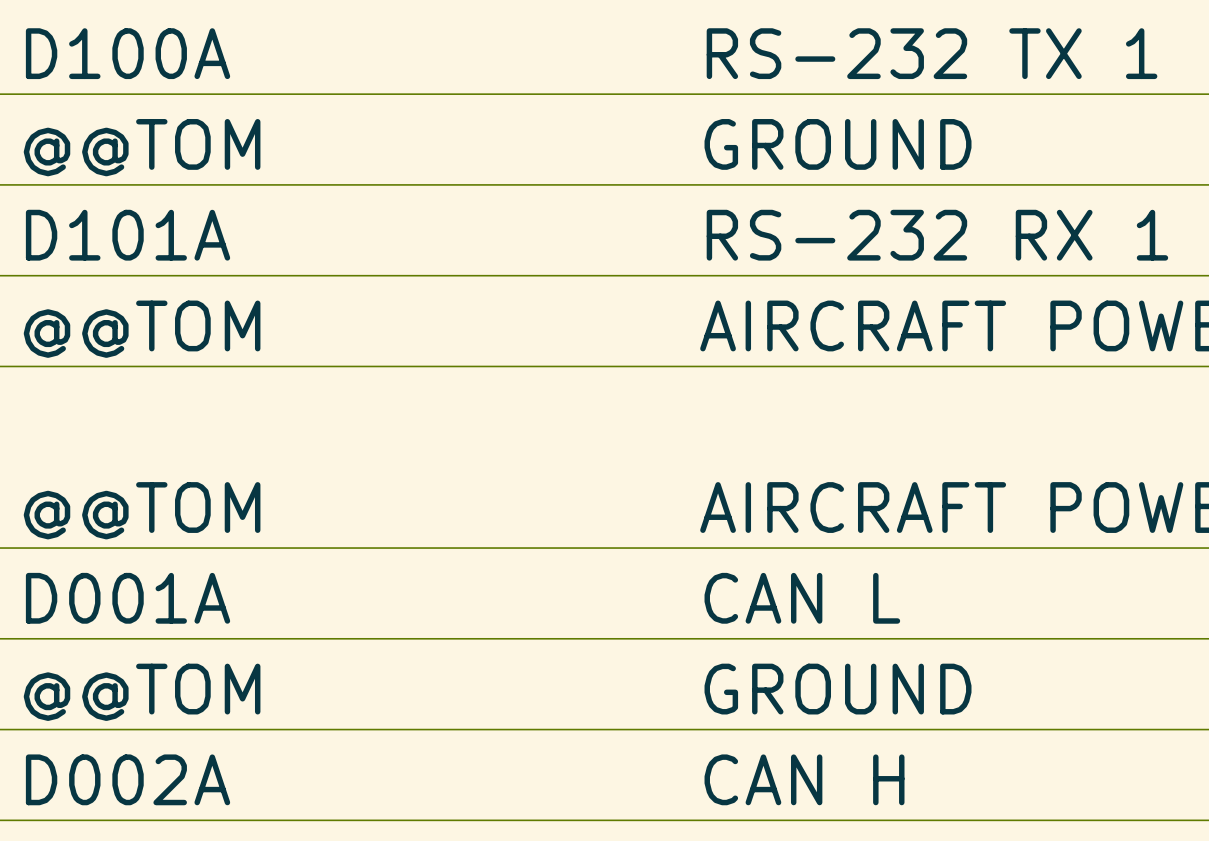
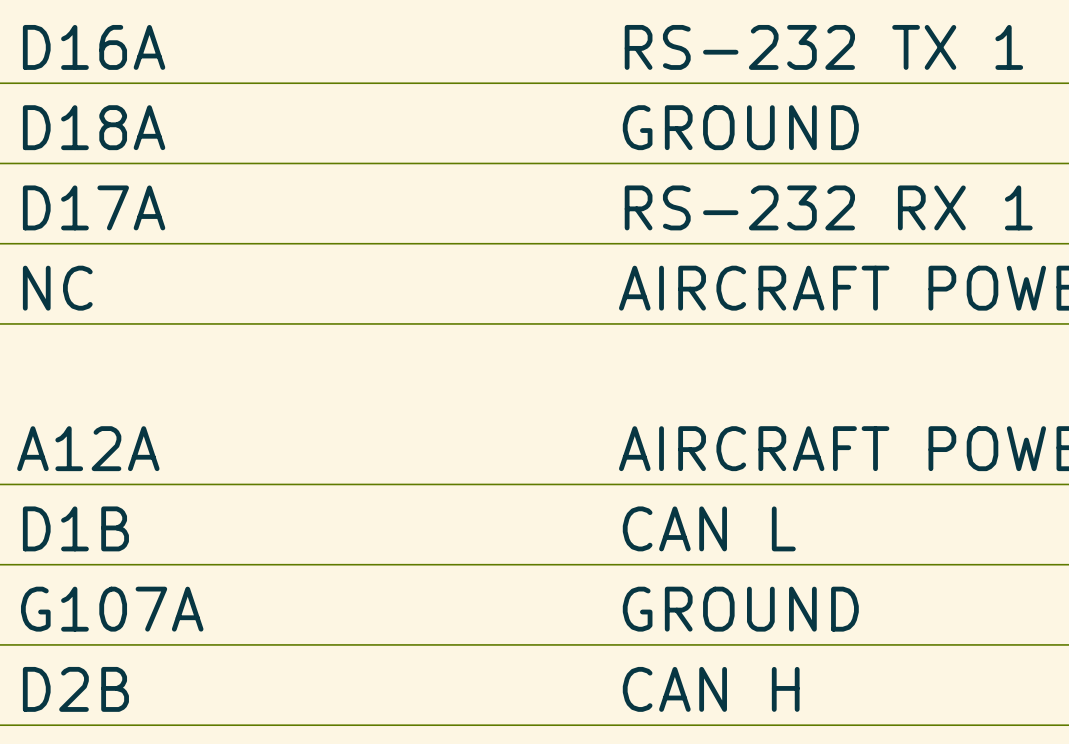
label: D100A (128, 53) -> D16A (94, 47)
label: @@TOM (142, 147) -> D18A (94, 127)
label: D101A (128, 235) -> D17A (94, 207)
label: @@TOM (142, 329) -> NC (57, 288)
label: @@TOM (142, 510) -> A12A (88, 448)
label: D001A (128, 598) -> D1B (75, 528)
label: @@TOM (142, 692) -> G107A (112, 609)
label: D002A (128, 779) -> D2B (75, 689)

